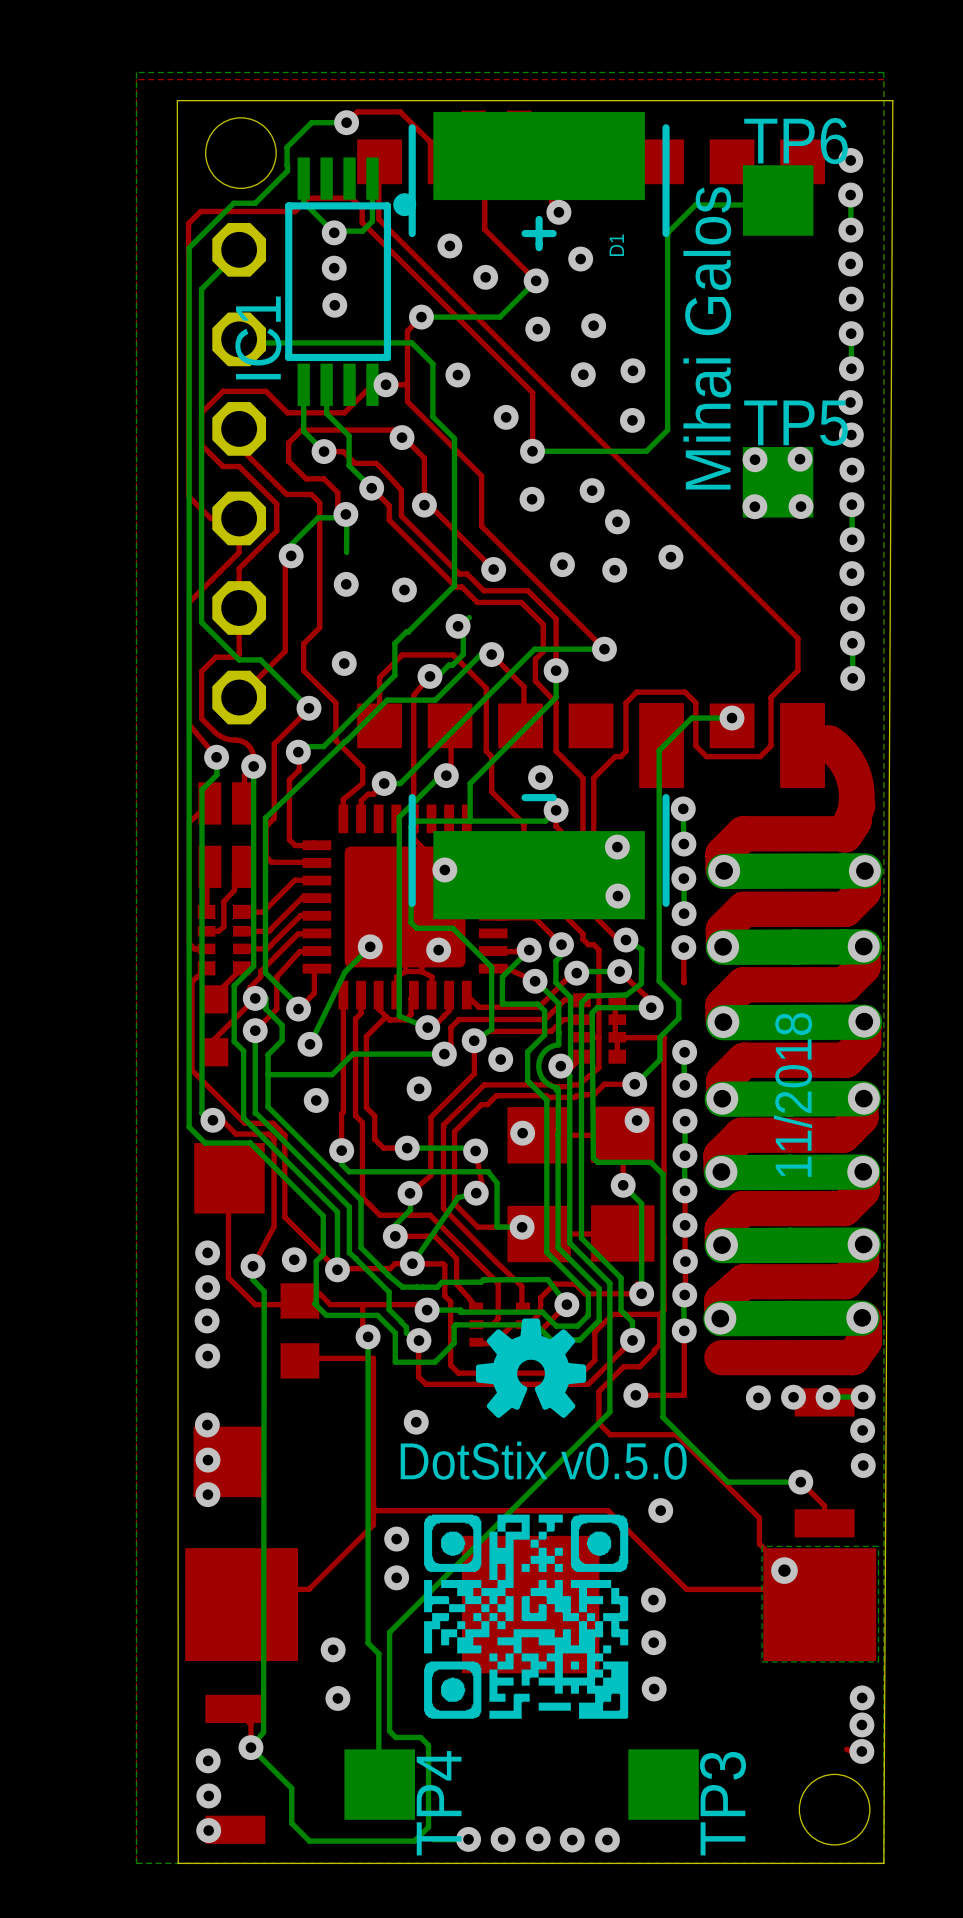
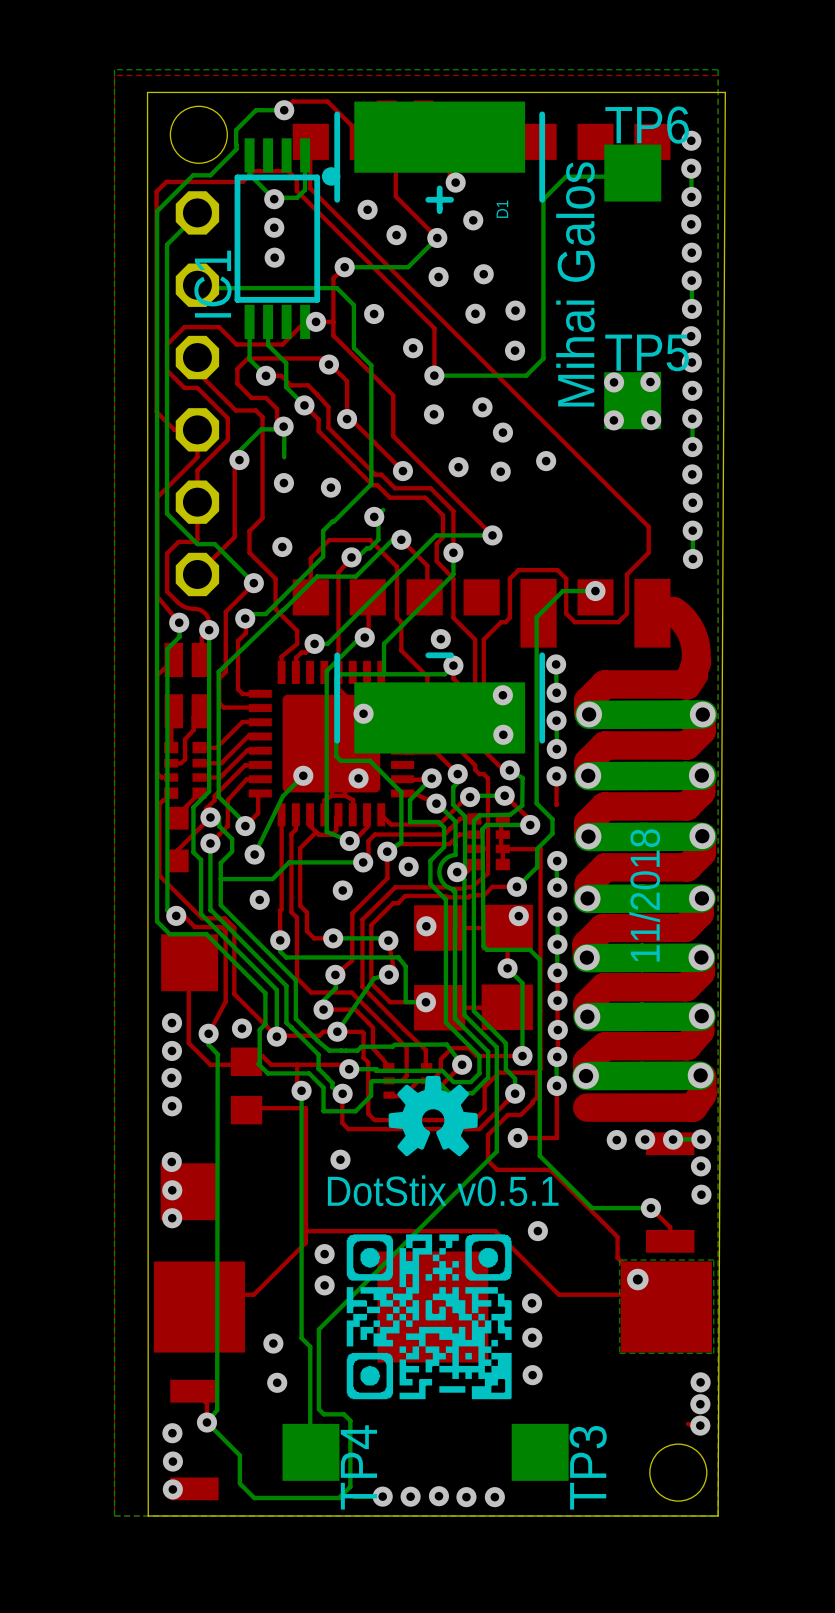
text: DotStix v0.5.0 (543, 1460) -> DotStix v0.5.1 (443, 1190)

